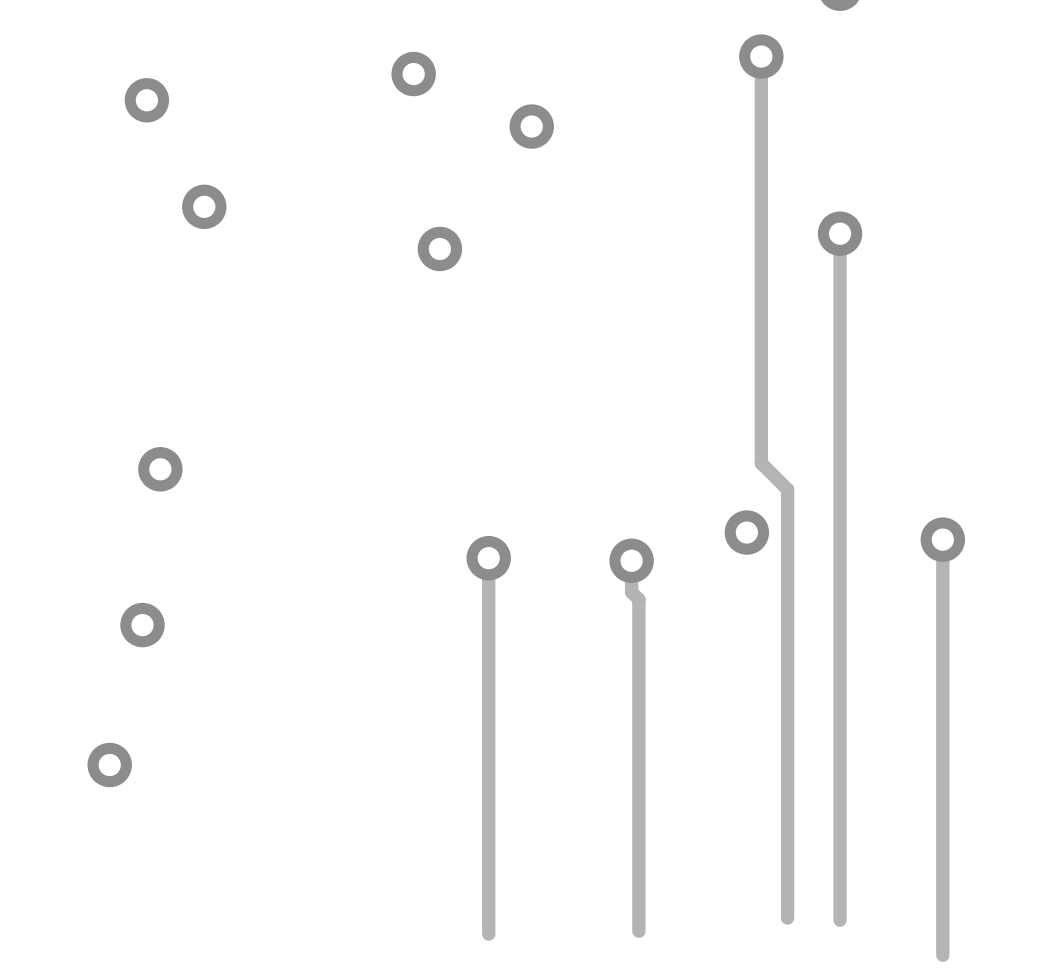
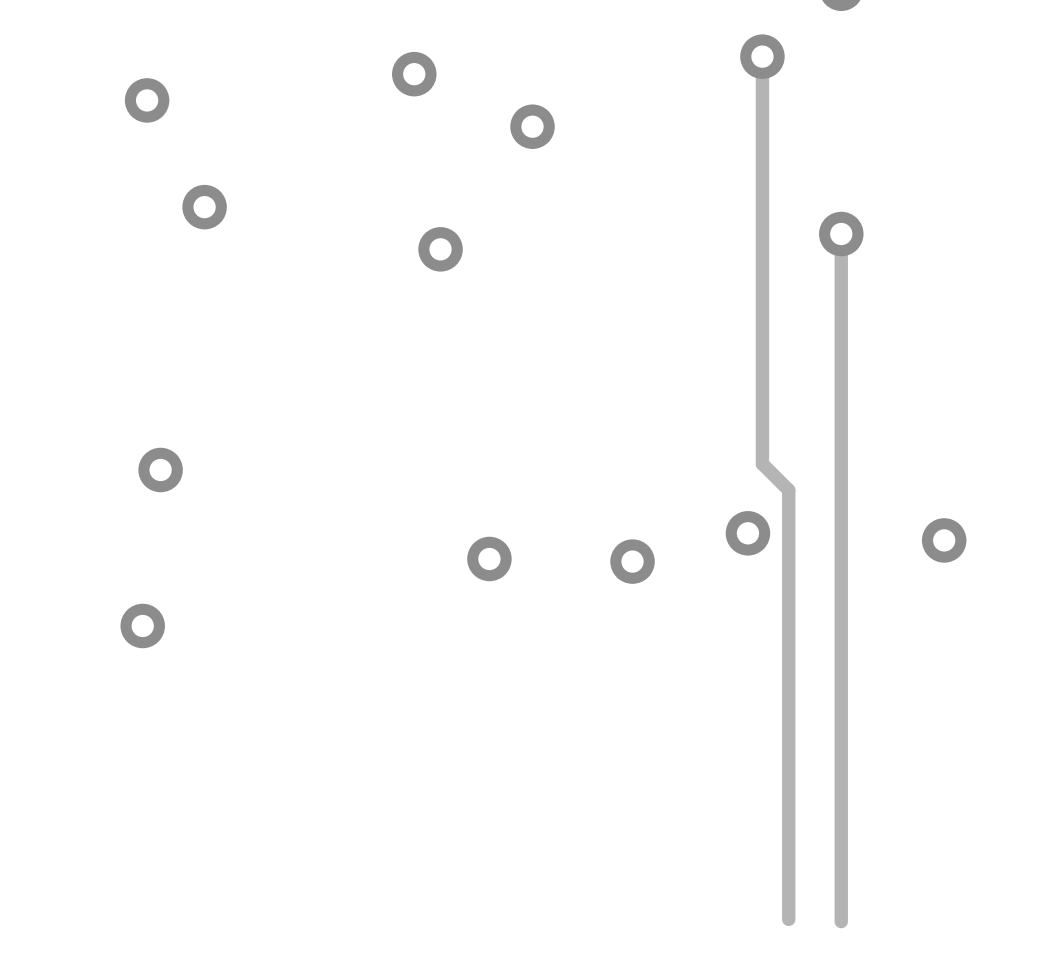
track: (942, 539) (942, 955) -> none
track: (488, 558) (488, 934) -> none
track: (631, 560) (631, 592) (638, 599) (638, 931) -> none
via: (109, 765) -> none

